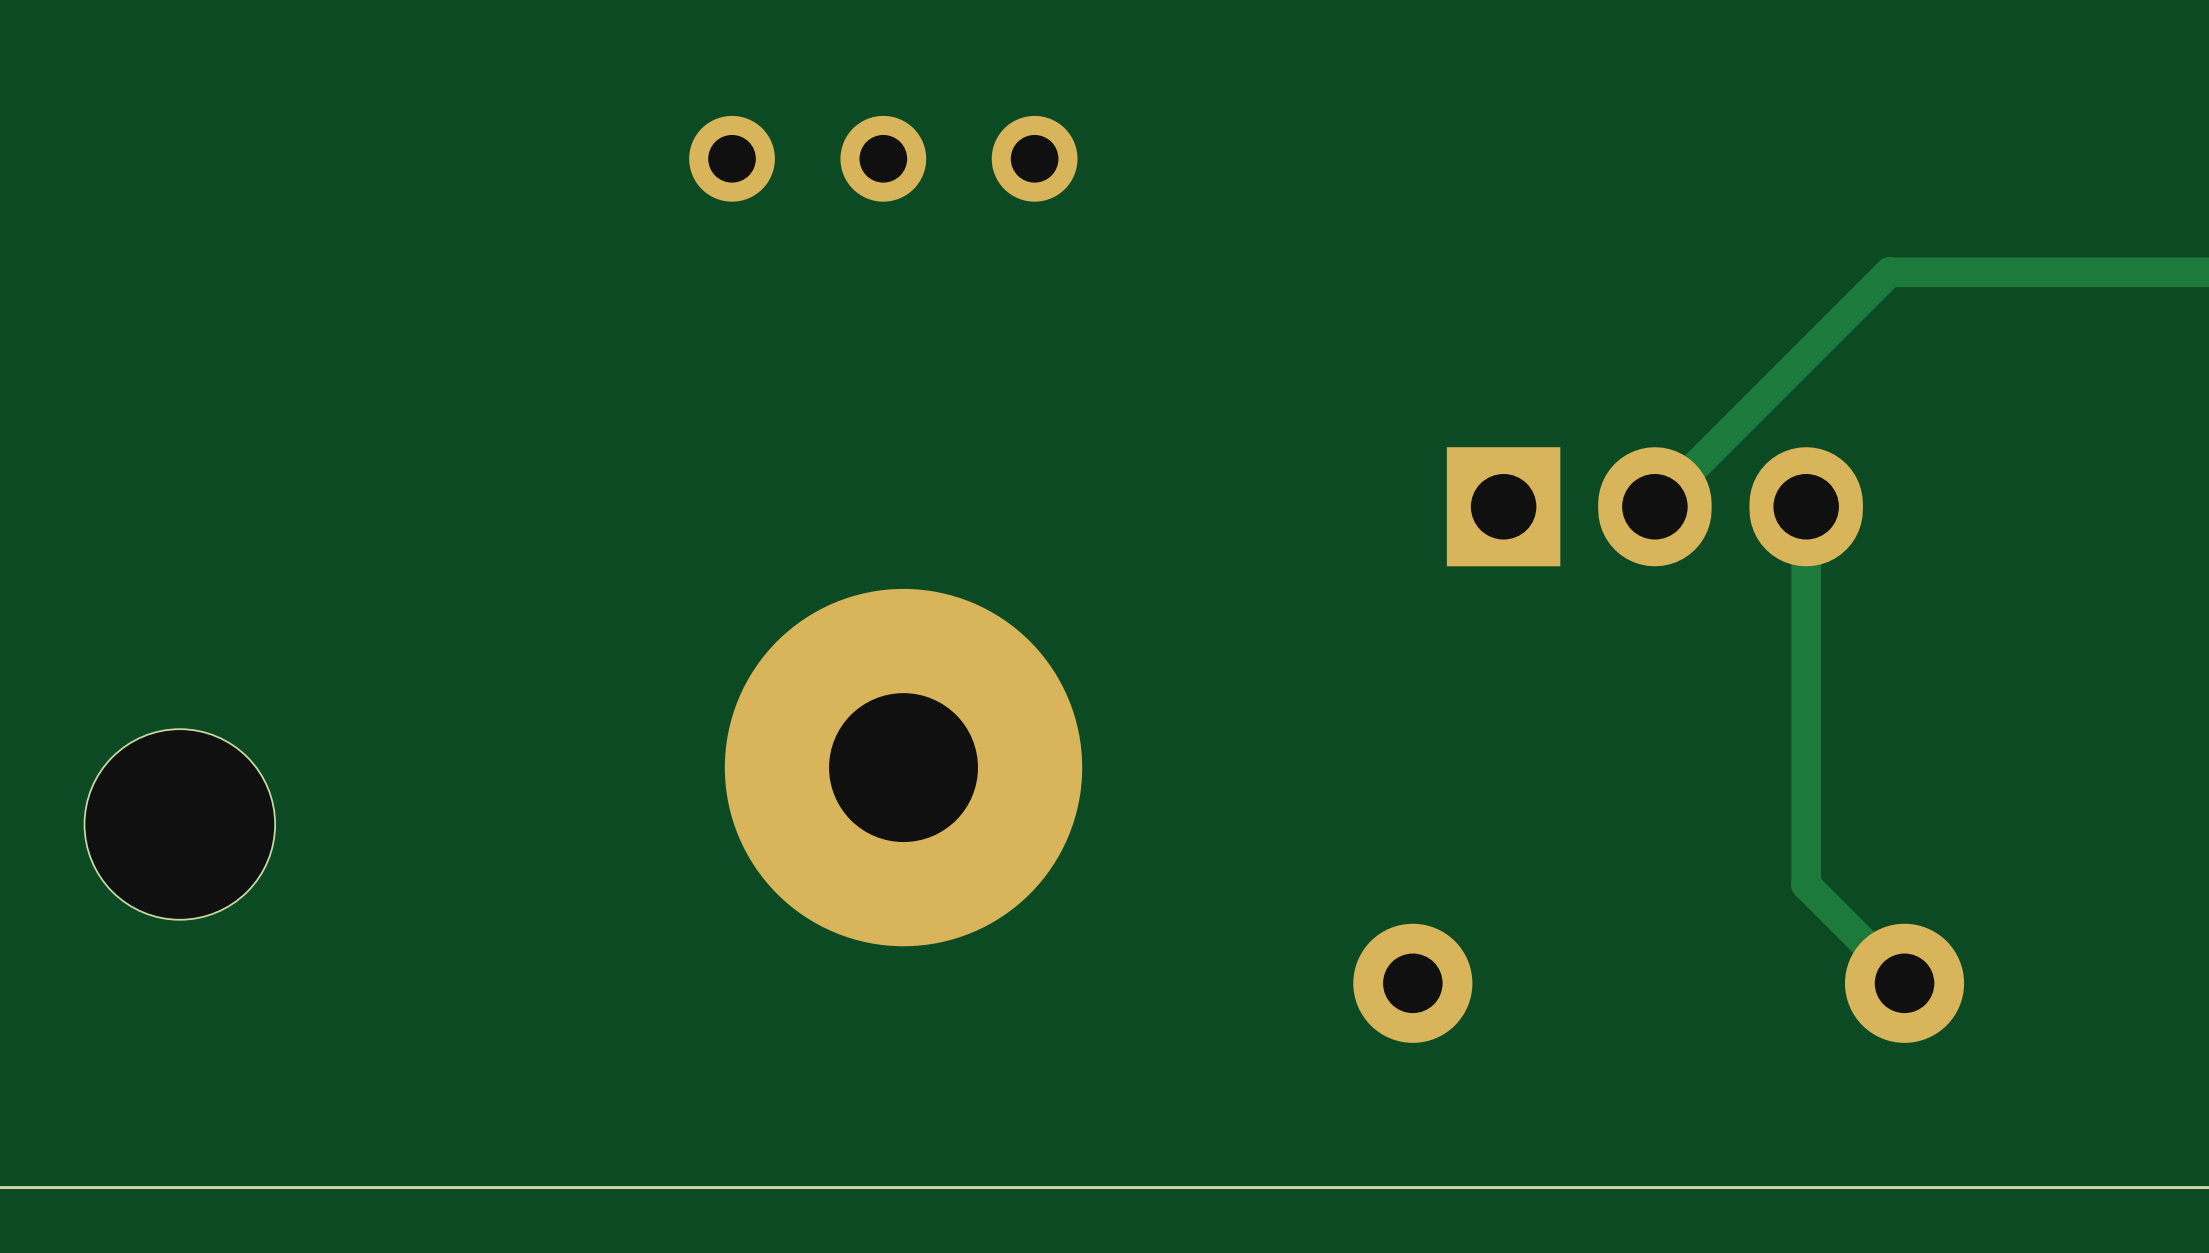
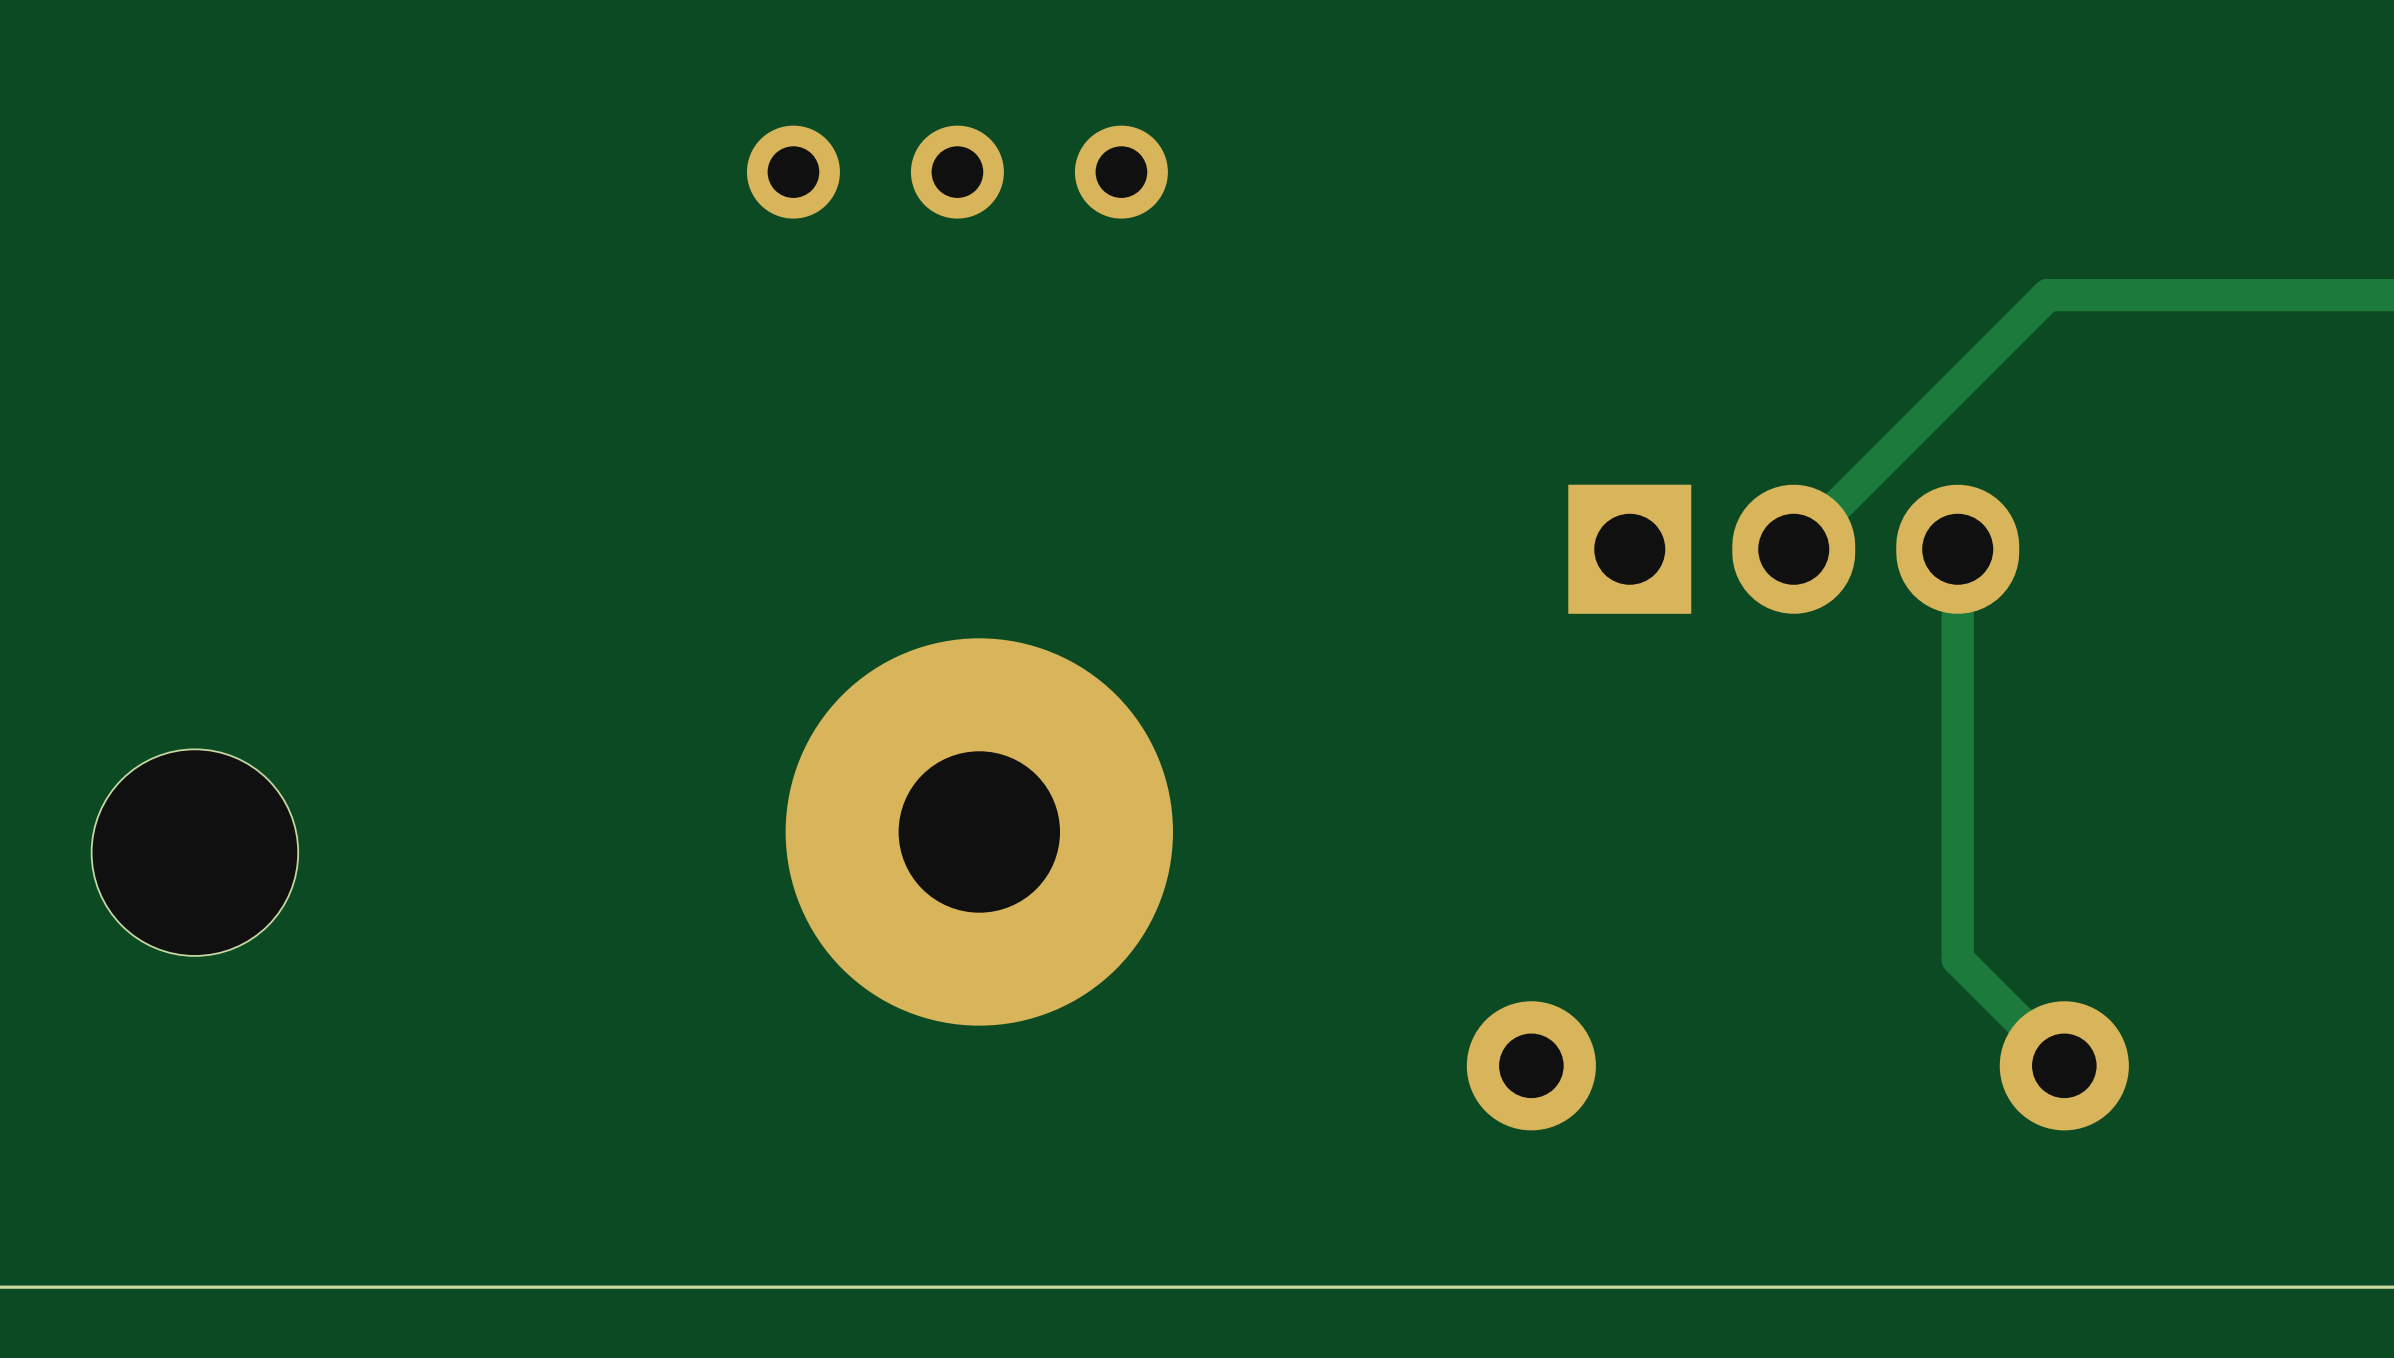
part position: (179, 824) -> (194, 852)

